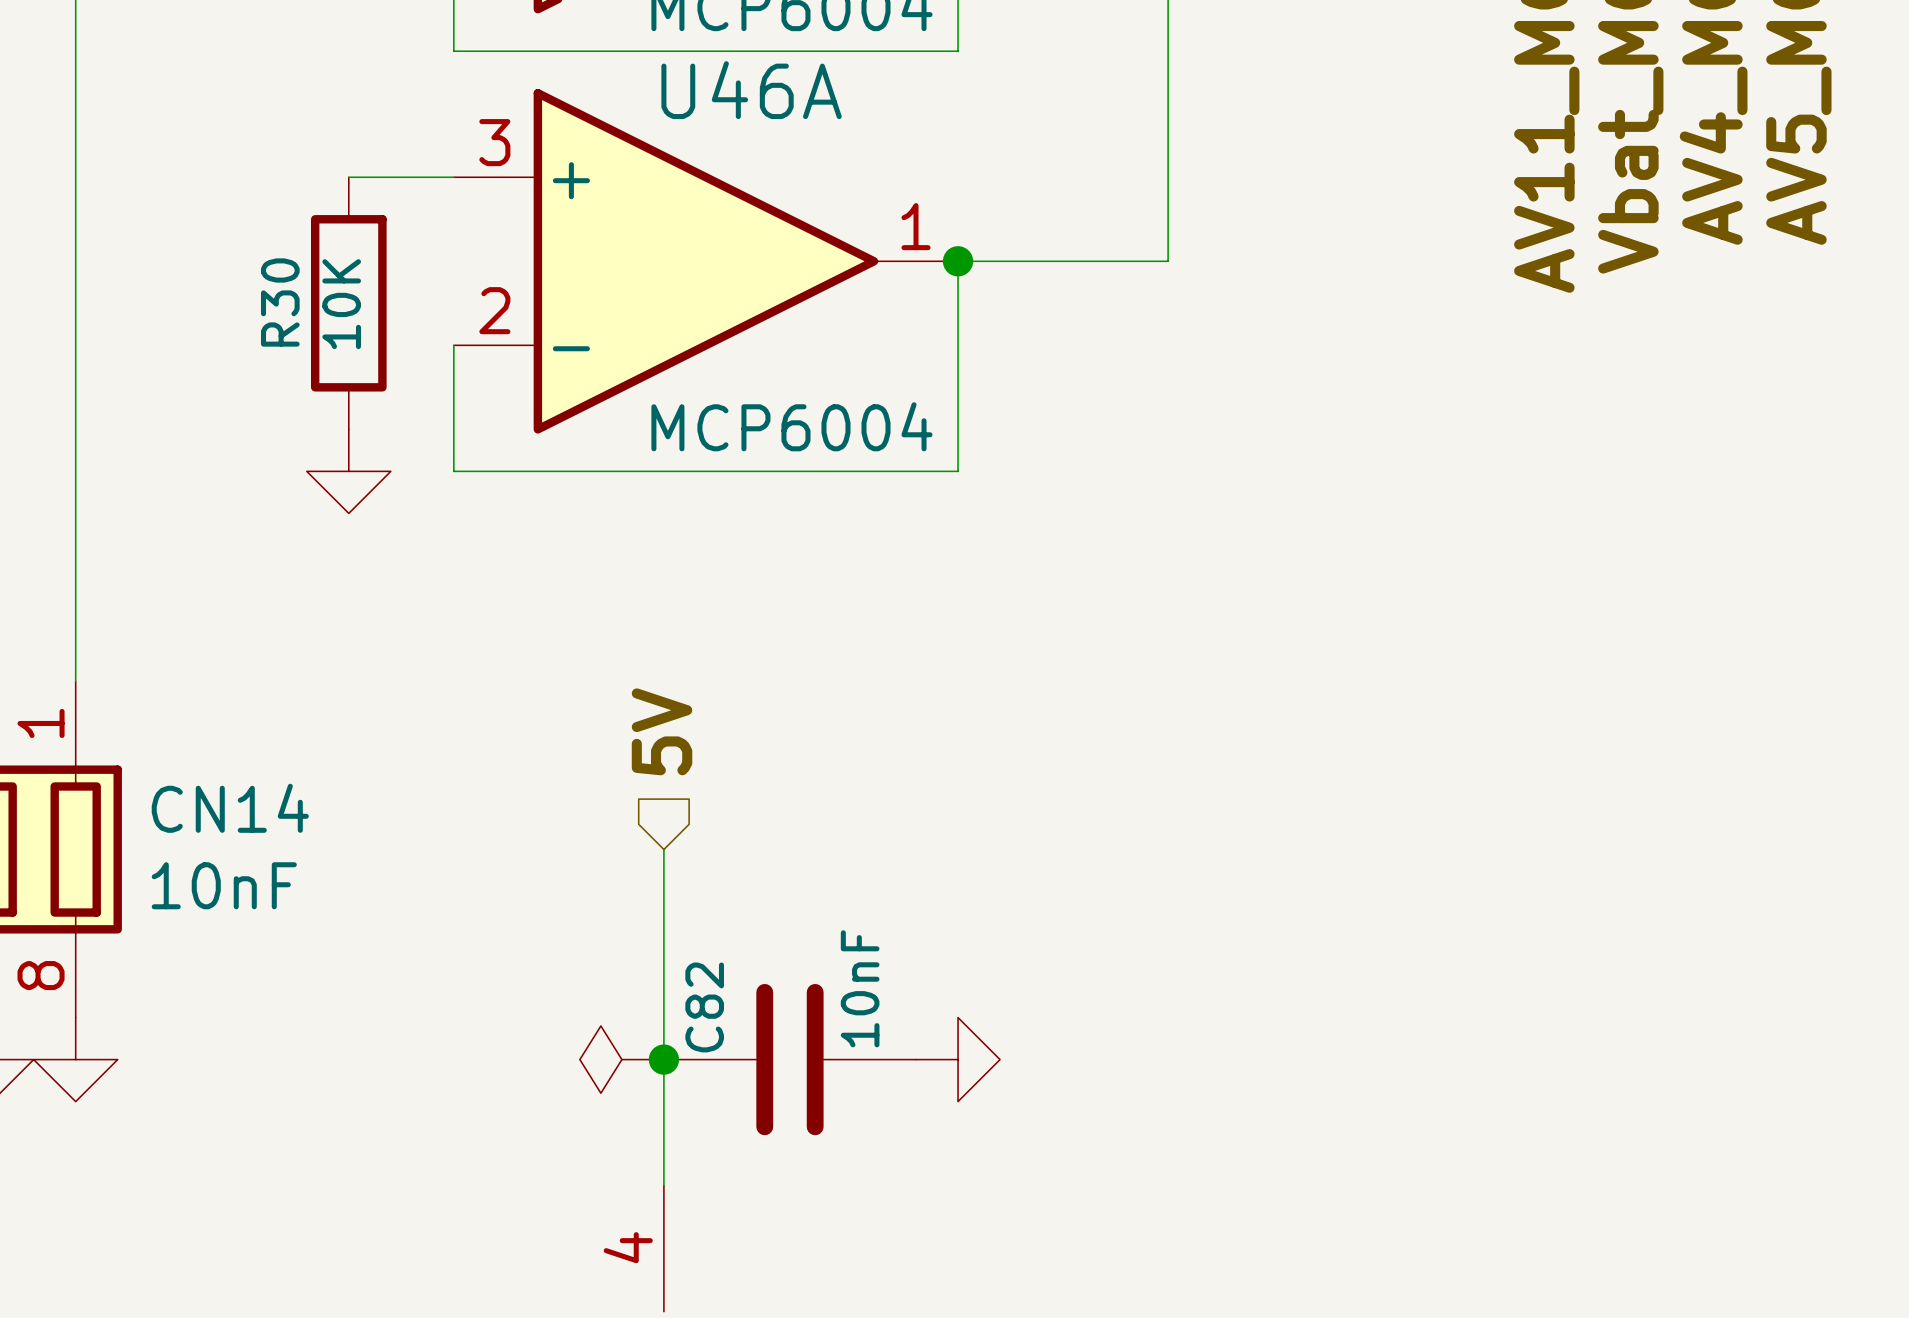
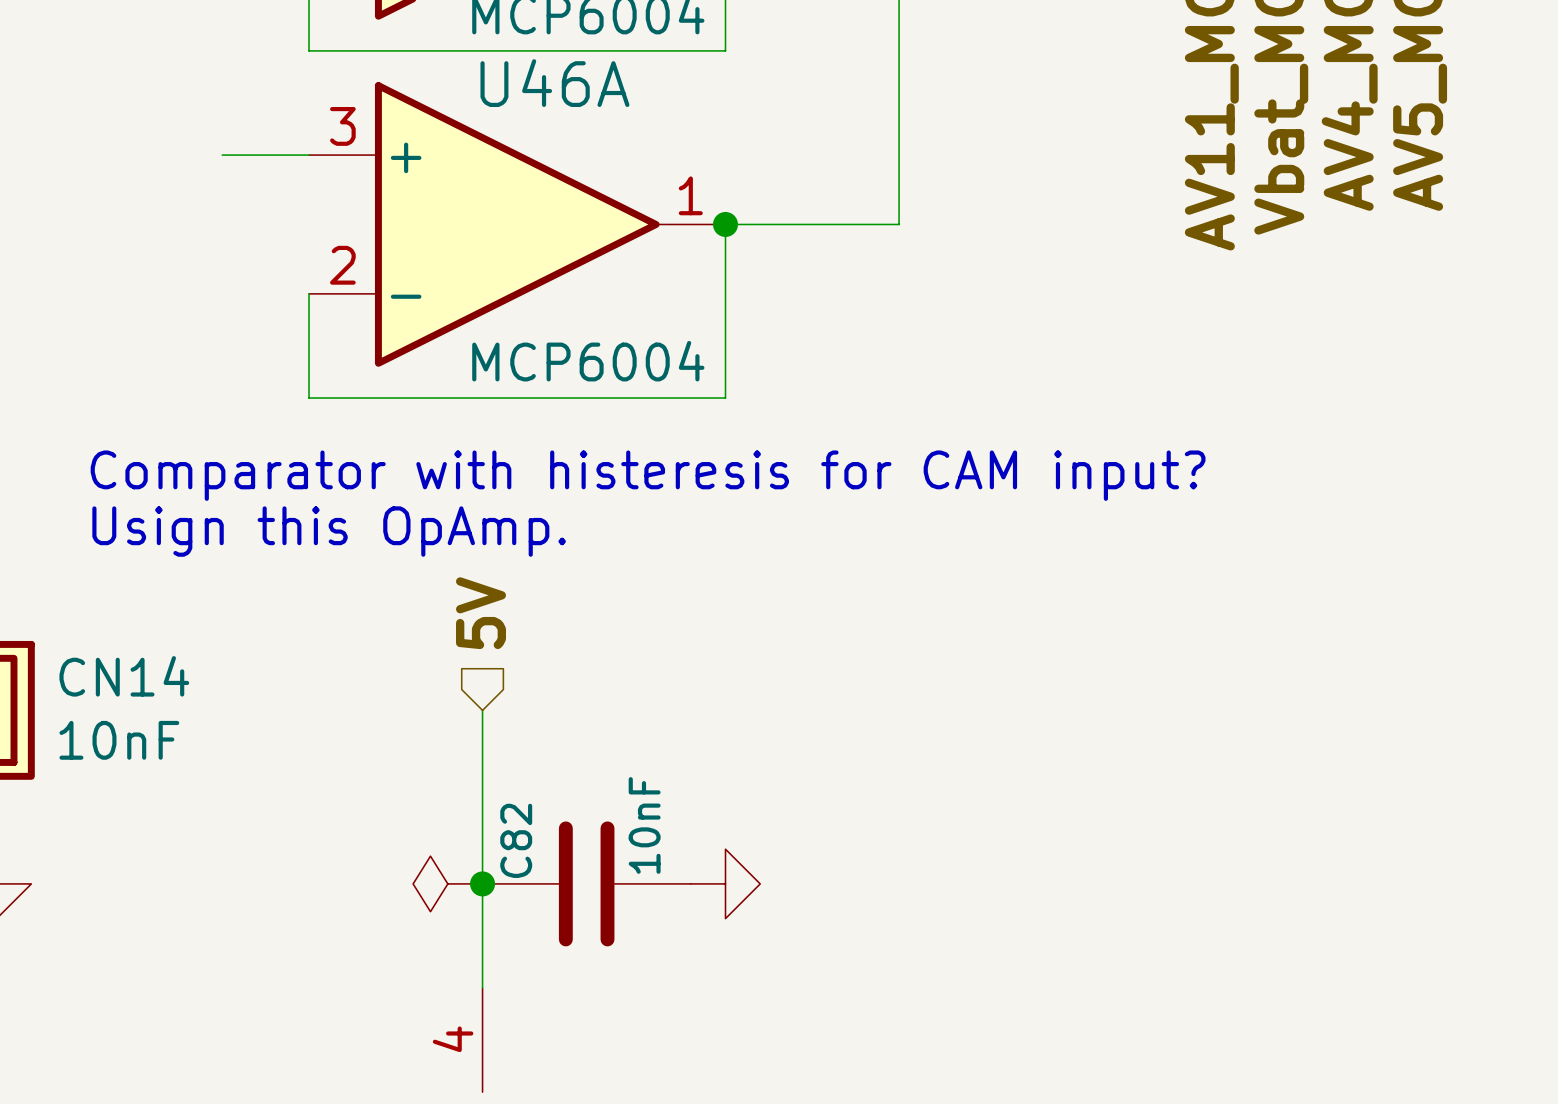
R30: 10K (348, 303) -> none
power symbol: (348, 471) -> none
text: none -> Comparator with histeresis for CAM input? (648, 475)
text: none -> Usign this OpAmp. (329, 531)

